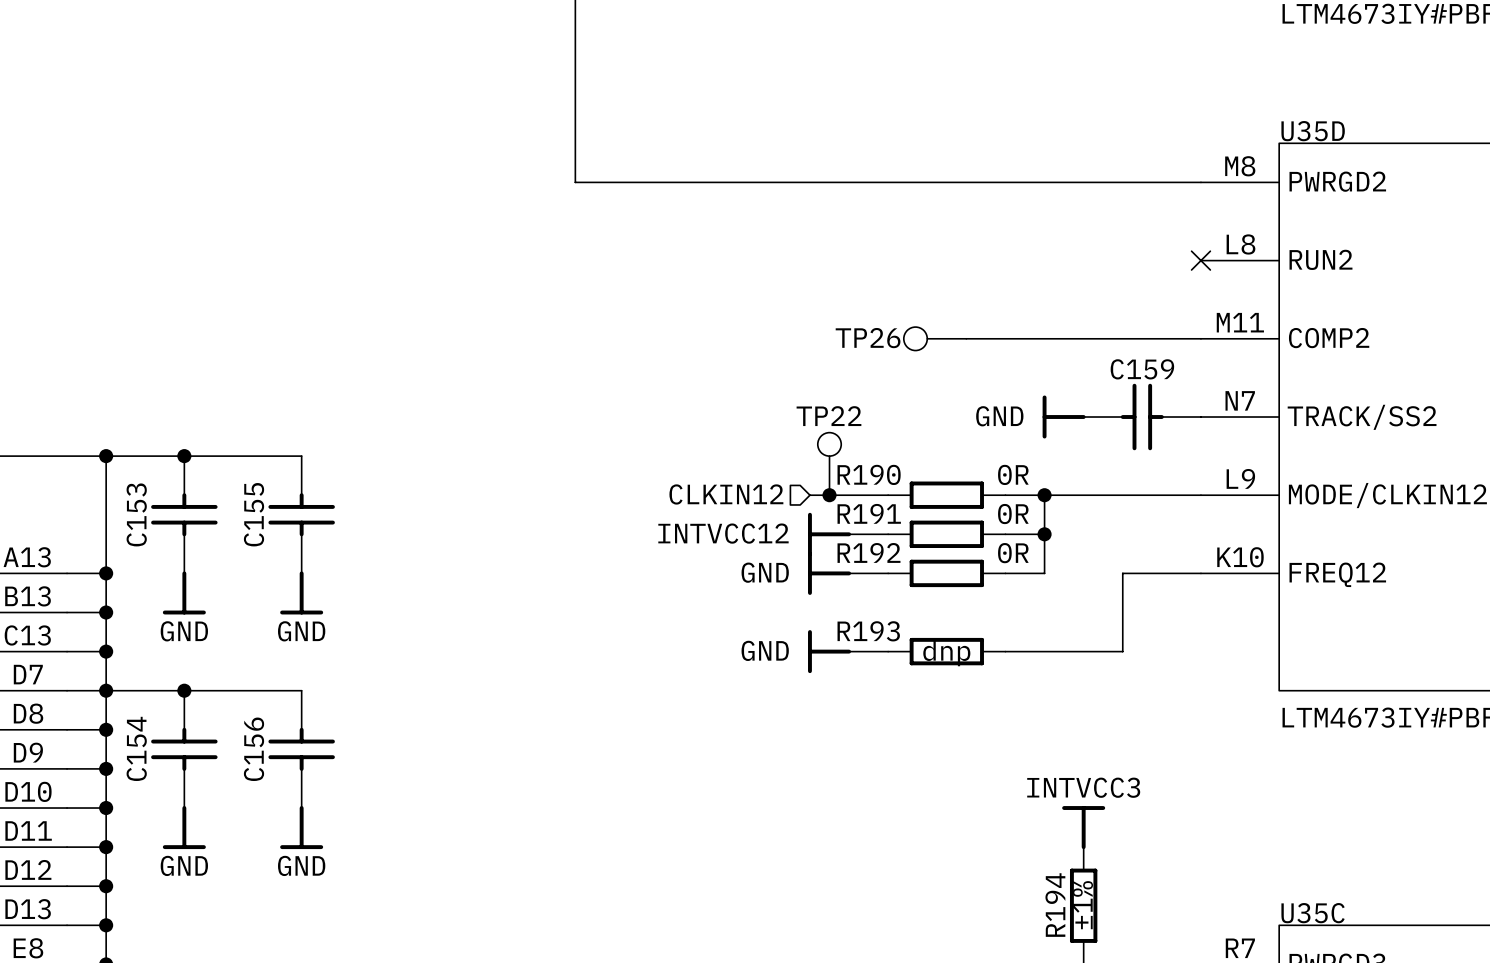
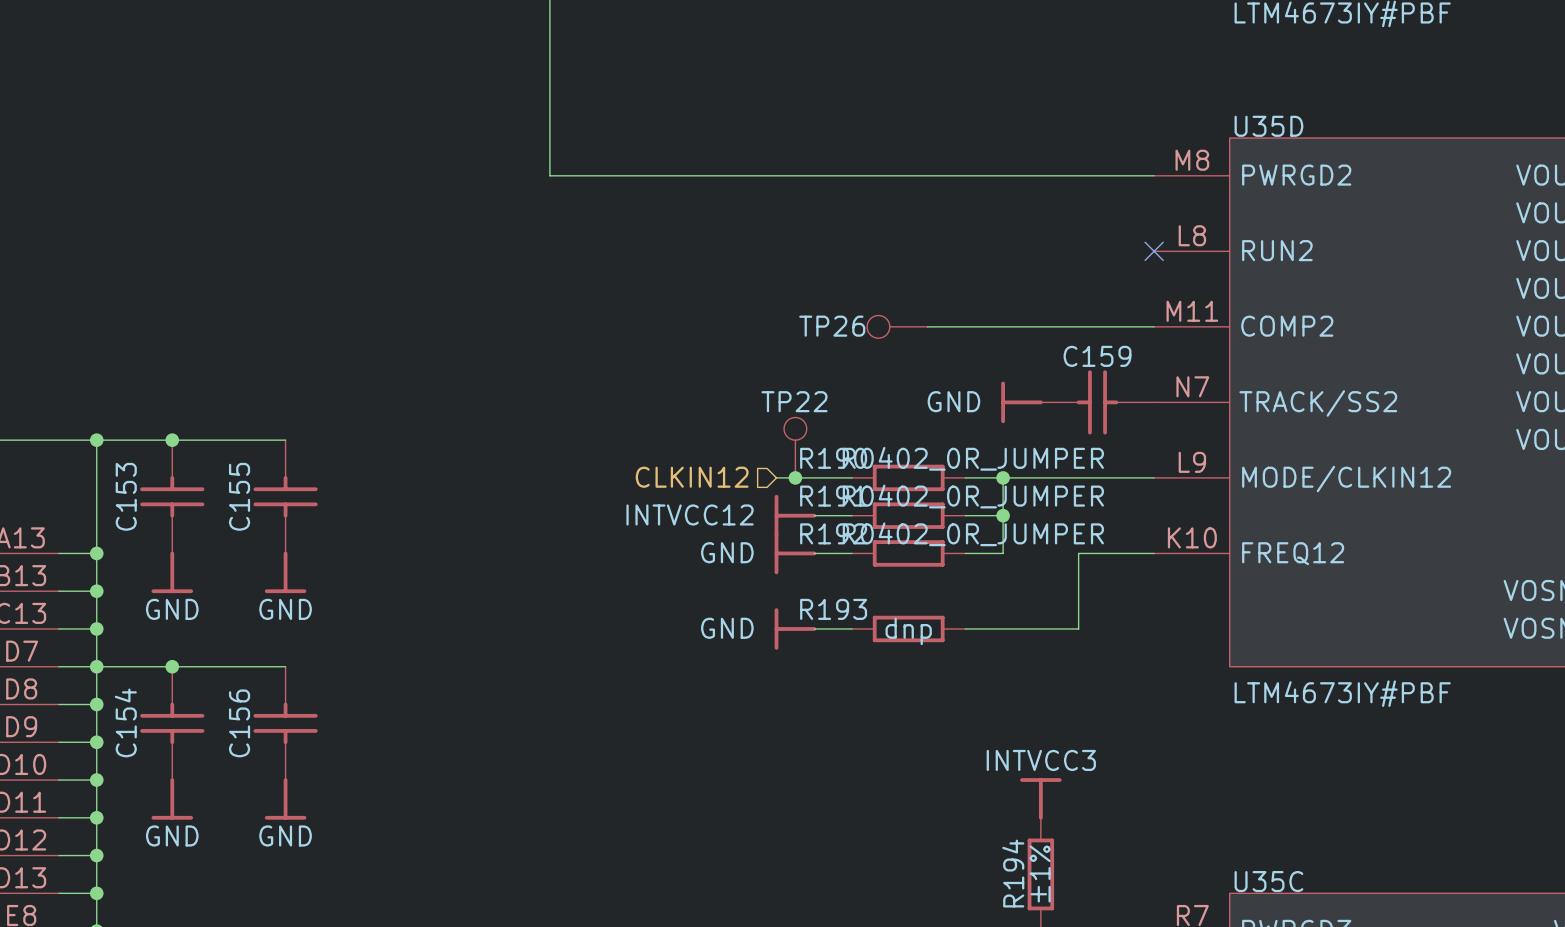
R190 value: 0R (1013, 474) -> R0402_0R_JUMPER (973, 458)
R191 value: 0R (1013, 514) -> R0402_0R_JUMPER (973, 496)
R192 value: 0R (1013, 553) -> R0402_0R_JUMPER (973, 534)

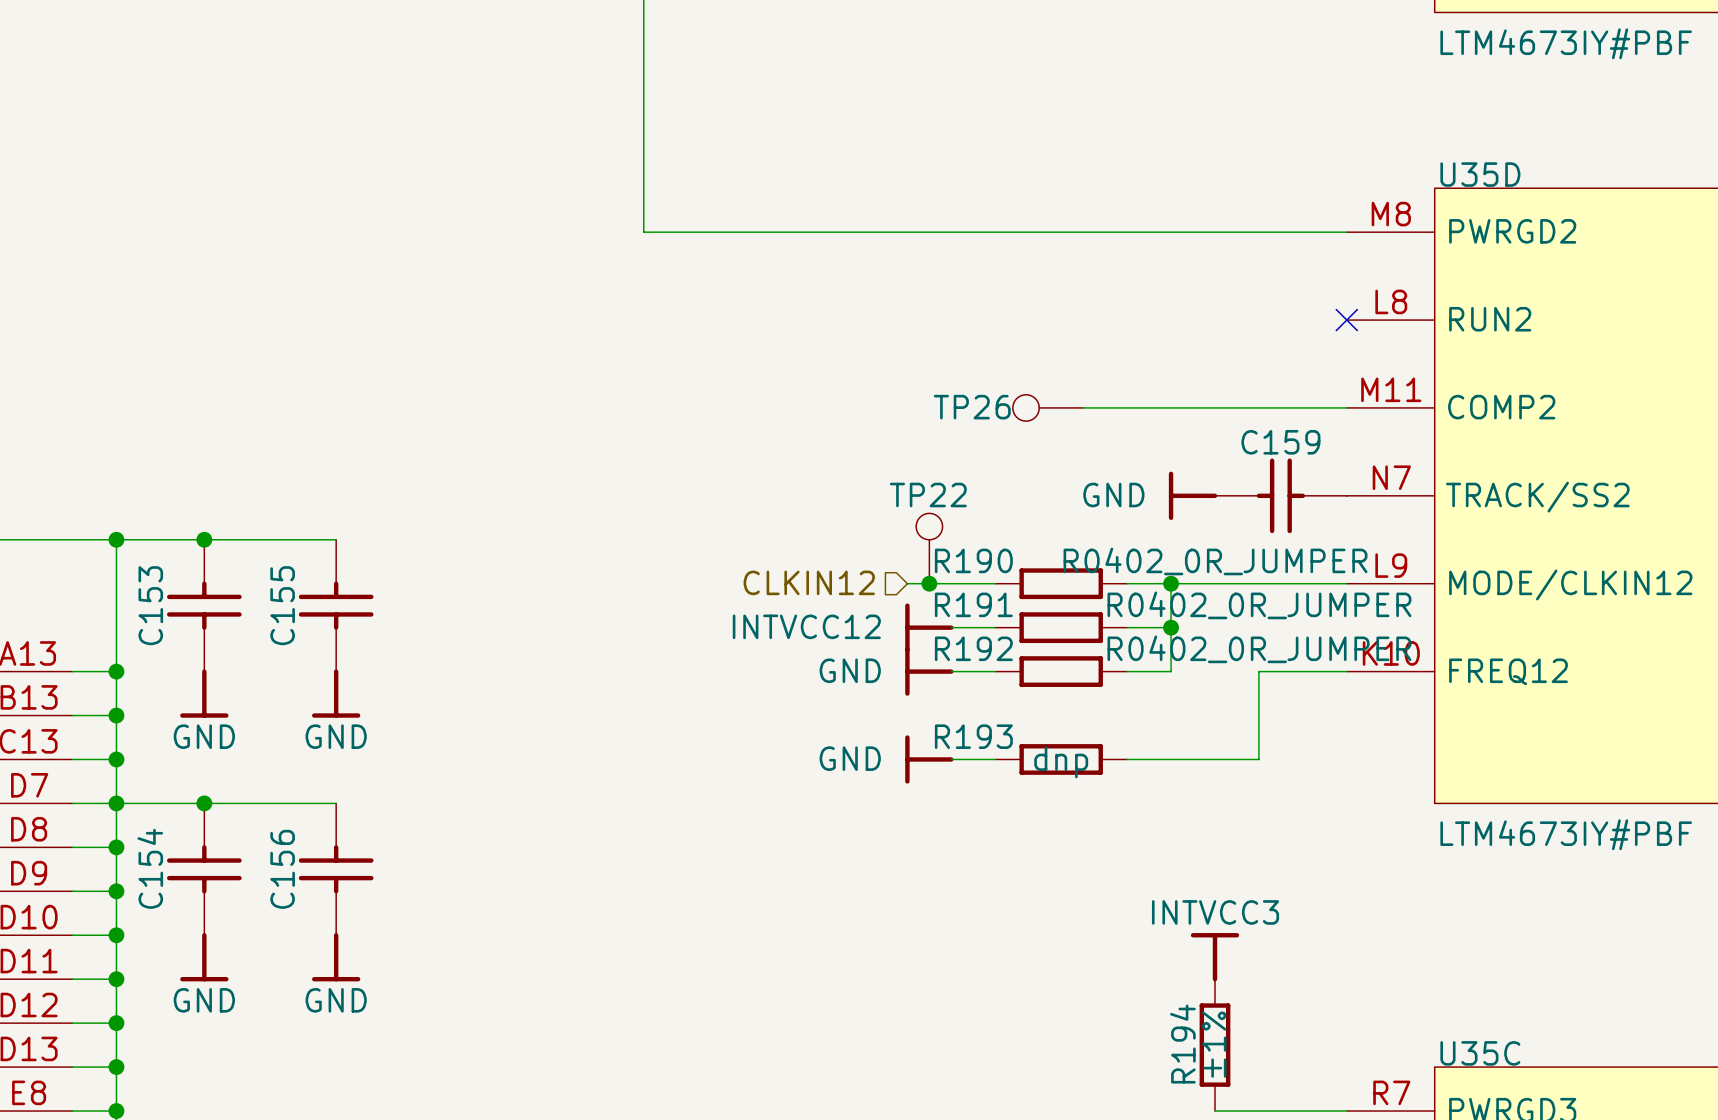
R190 value position: R0402_0R_JUMPER (973, 458) -> R0402_0R_JUMPER (1215, 561)
R191 value position: R0402_0R_JUMPER (973, 496) -> R0402_0R_JUMPER (1259, 605)
R192 value position: R0402_0R_JUMPER (973, 534) -> R0402_0R_JUMPER (1259, 649)

